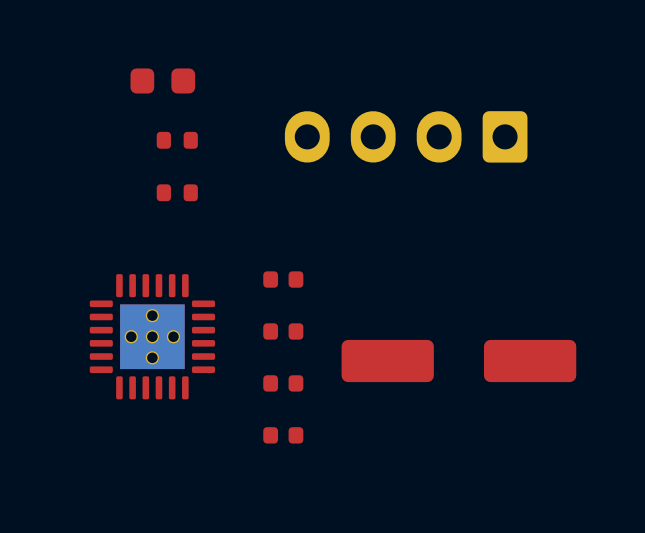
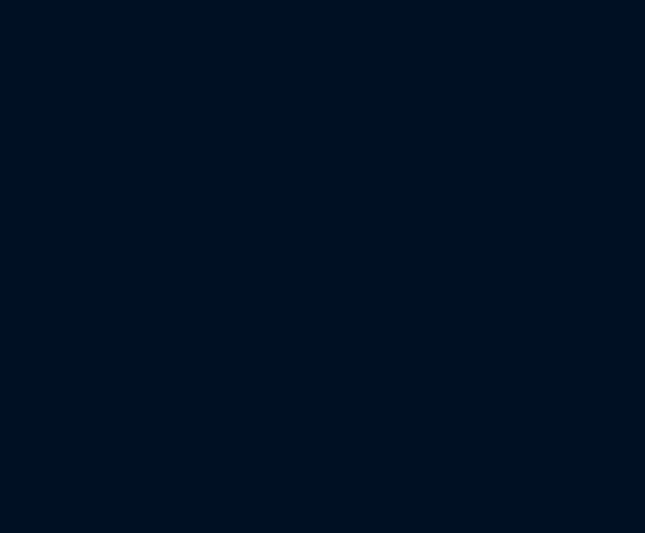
part: (162, 80) -> none
part: (406, 136) -> none
part: (177, 140) -> none
part: (177, 192) -> none
part: (283, 279) -> none
part: (283, 331) -> none
part: (152, 336) -> none
part: (458, 361) -> none
part: (283, 383) -> none
part: (283, 435) -> none

